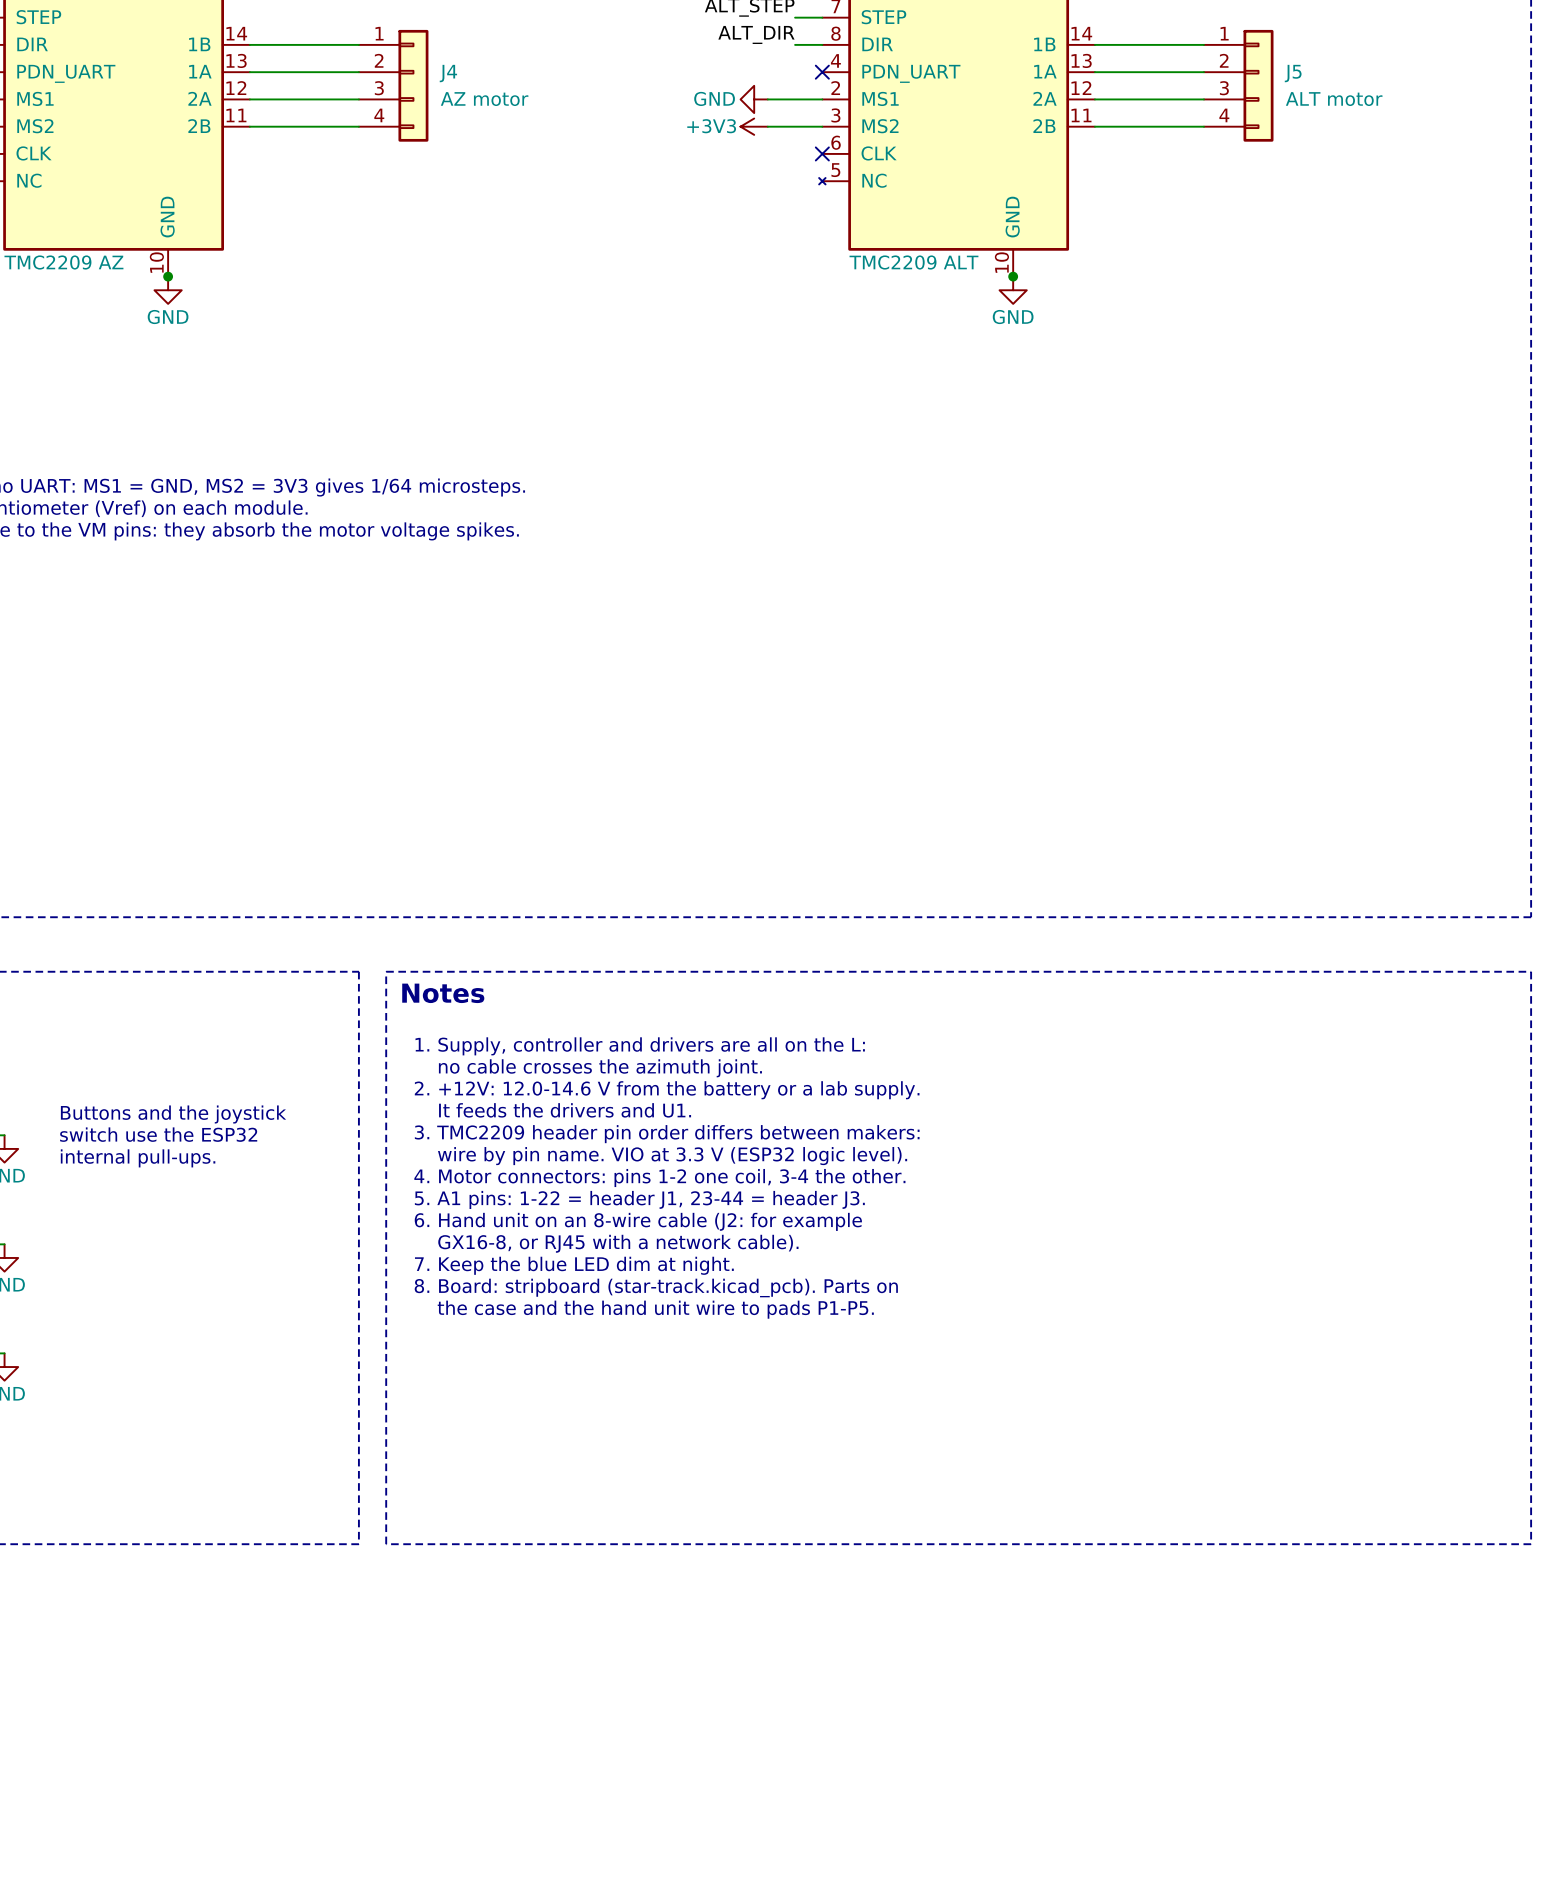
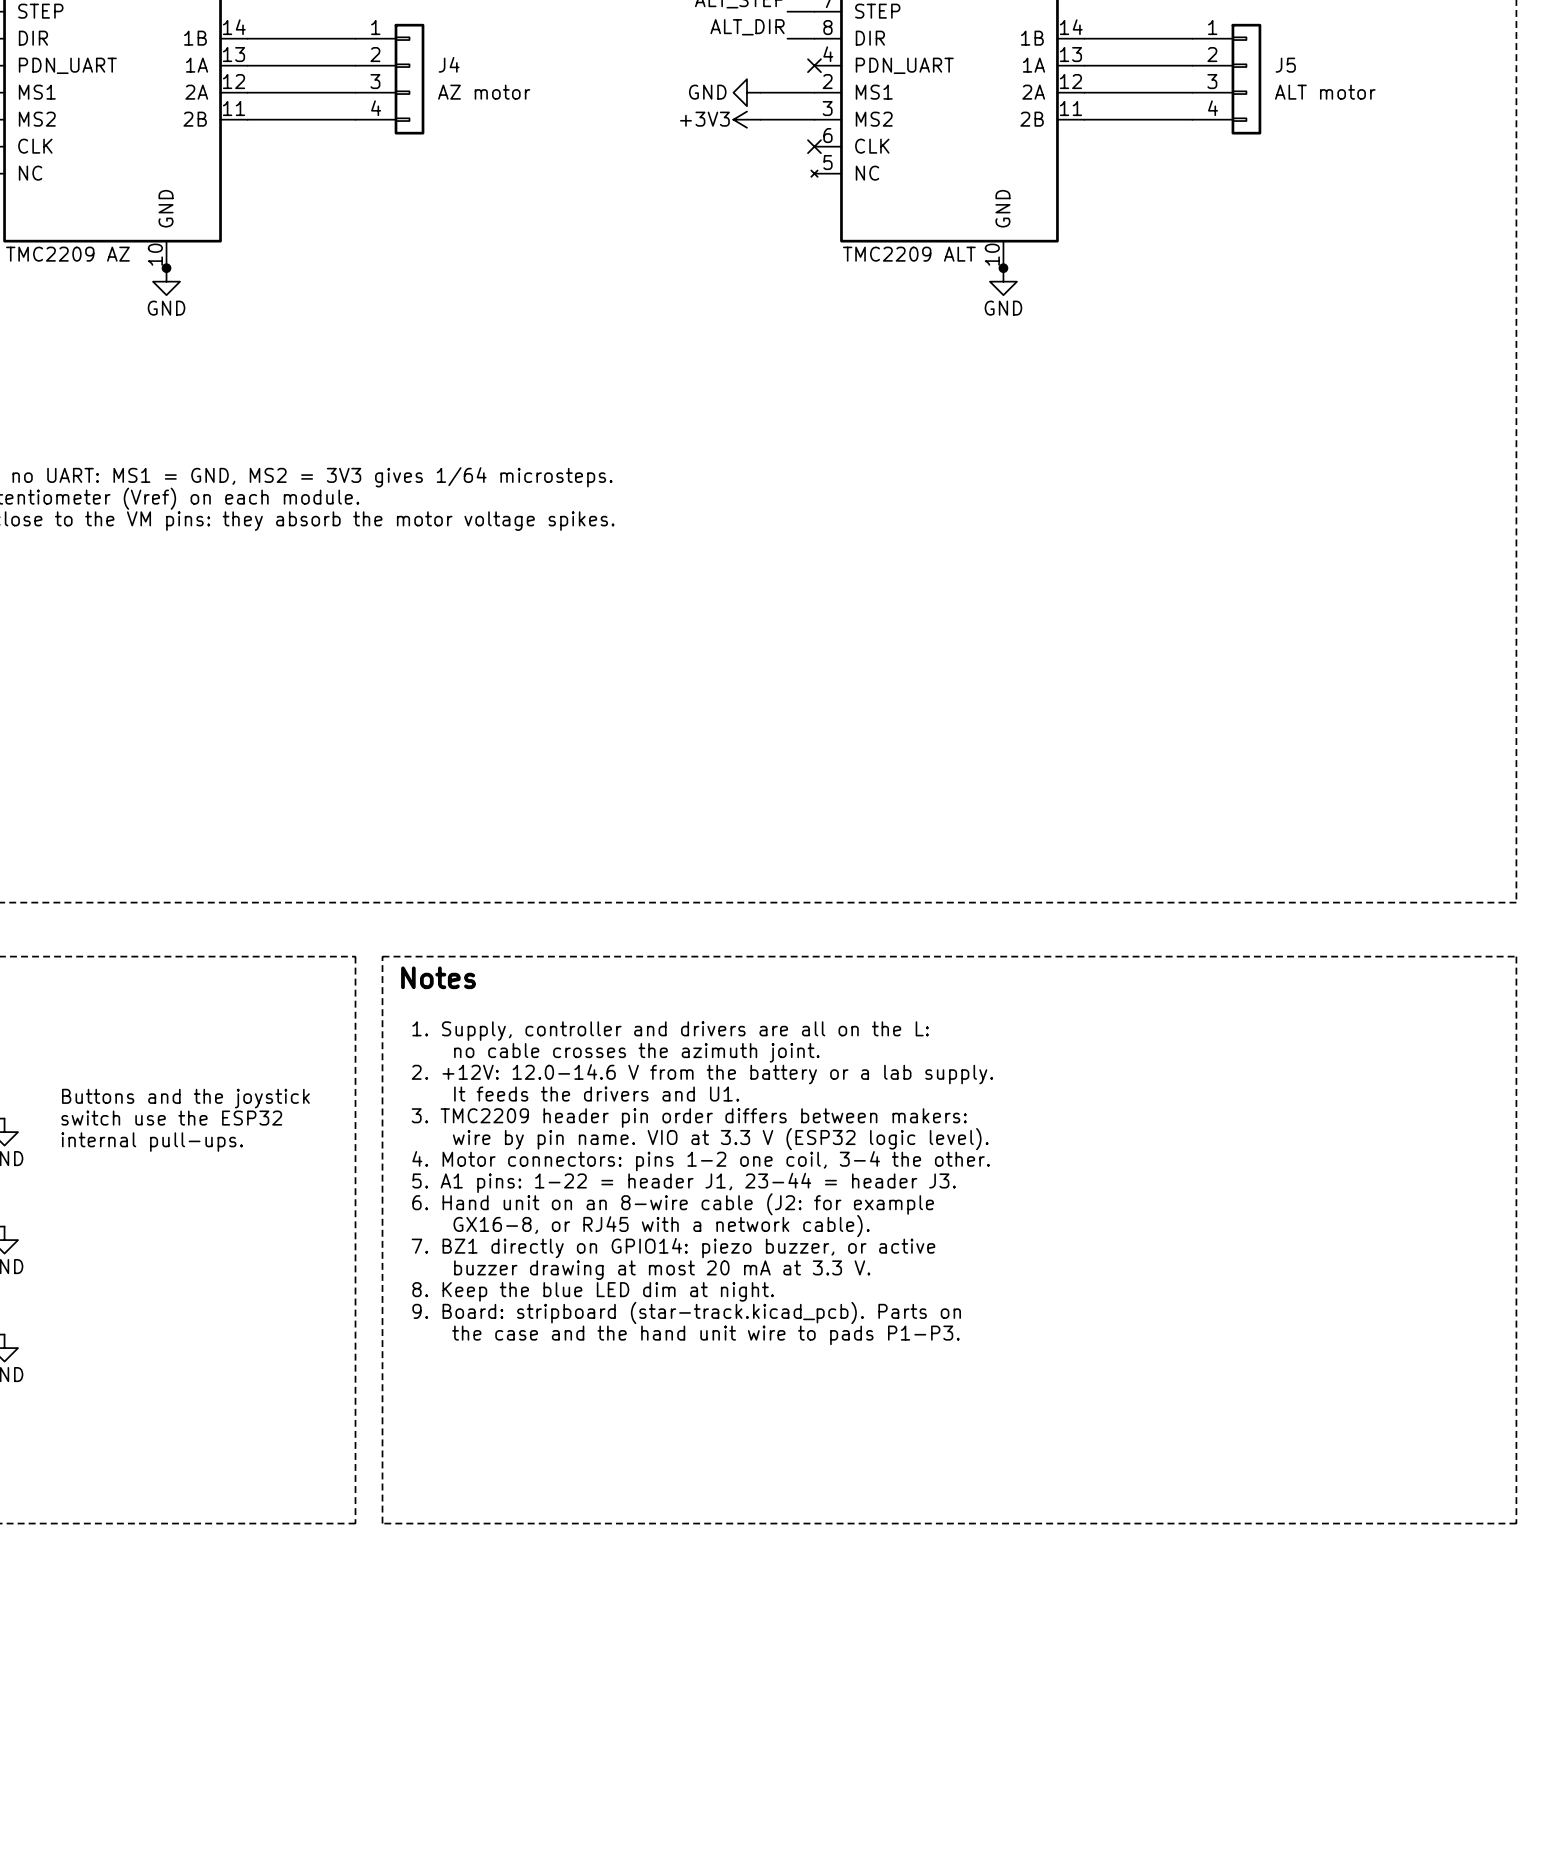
text: 7. Keep the blue LED dim at night. (574, 1265) -> 7. BZ1 directly on GPIO14: piezo buzzer, or active (673, 1248)
text: 8. Board: stripboard (star-track.kicad_pcb). Parts on (656, 1287) -> buzzer drawing at most 20 mA at 3.3 V. (662, 1270)
text: the case and the hand unit wire to pads P1-P5. (655, 1309) -> 8. Keep the blue LED dim at night. (593, 1291)
text: none -> 9. Board: stripboard (star-track.kicad_pcb). Parts on (686, 1312)
text: none -> the case and the hand unit wire to pads P1-P3. (705, 1335)

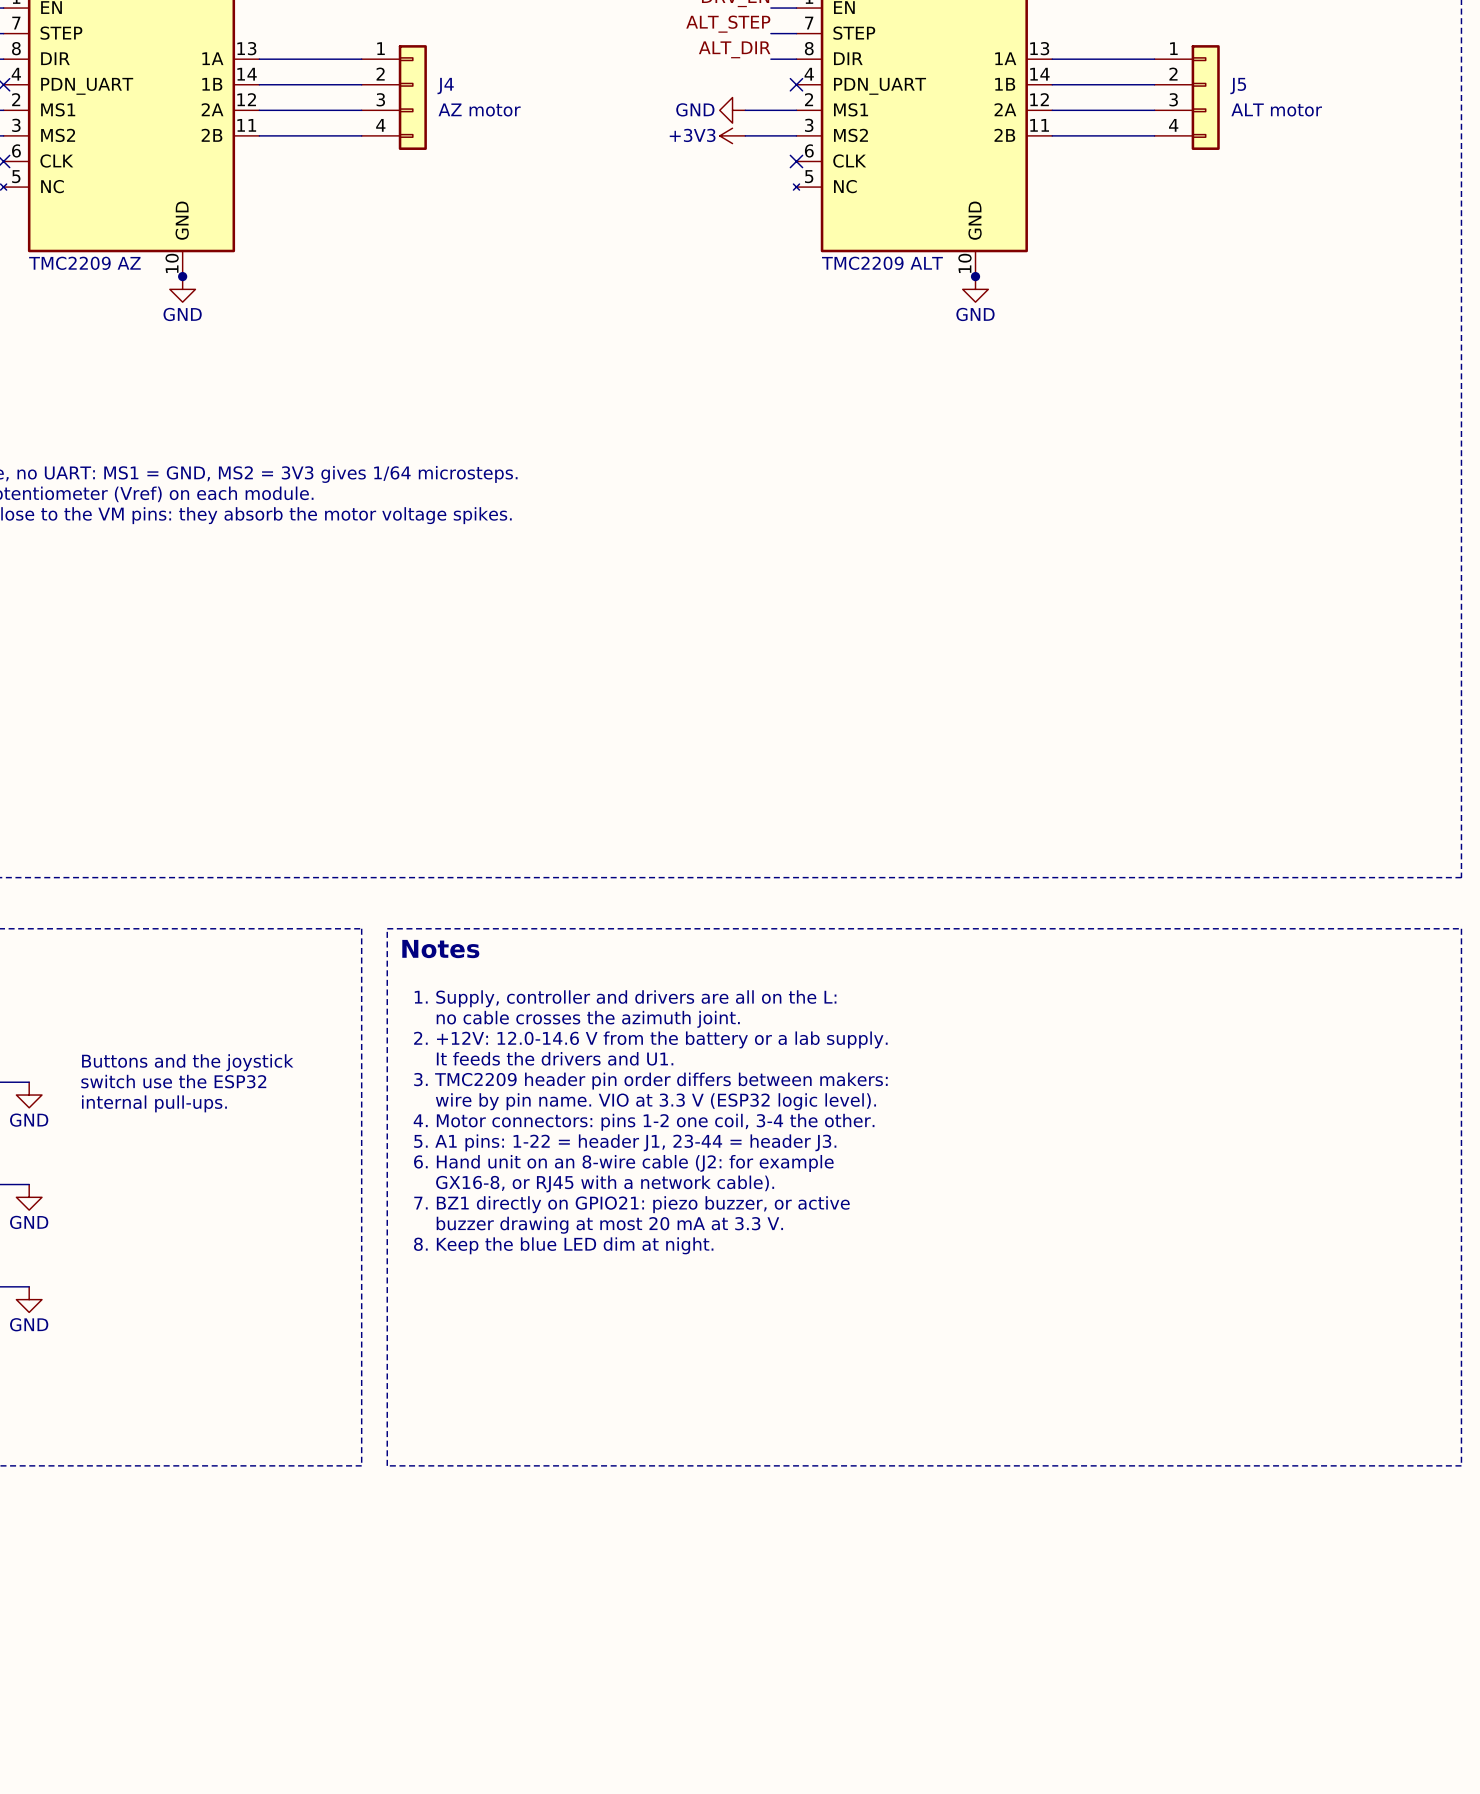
part pin number: 14 (234, 27) -> 13 (246, 48)
part pin number: 14 (1071, 27) -> 13 (1039, 48)
part pin name: 1B (195, 38) -> 1A (212, 58)
part pin name: 1B (1032, 38) -> 1A (1005, 58)
part pin number: 13 (234, 54) -> 14 (247, 74)
part pin number: 13 (1070, 54) -> 14 (1039, 74)
part pin name: 1A (197, 65) -> 1B (212, 84)
part pin name: 1A (1034, 65) -> 1B (1005, 84)
text: 7. BZ1 directly on GPIO14: piezo buzzer, or active (673, 1248) -> 7. BZ1 directly on GPIO21: piezo buzzer, or active (631, 1204)
text: 9. Board: stripboard (star-track.kicad_pcb). Parts on (686, 1312) -> none
text: the case and the hand unit wire to pads P1-P3. (705, 1335) -> none

